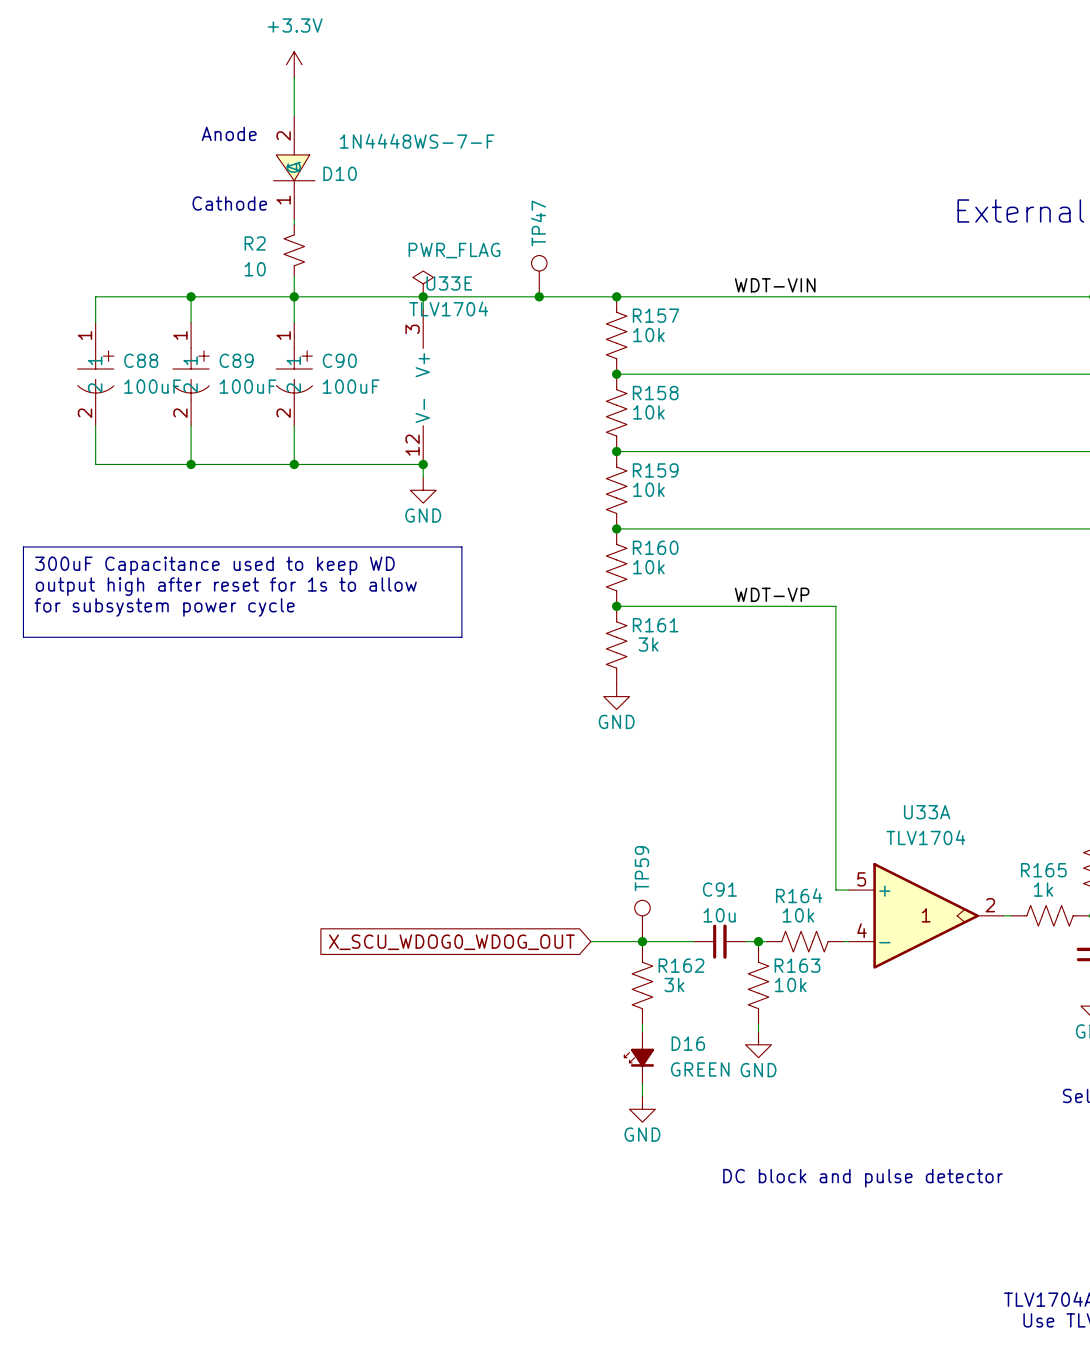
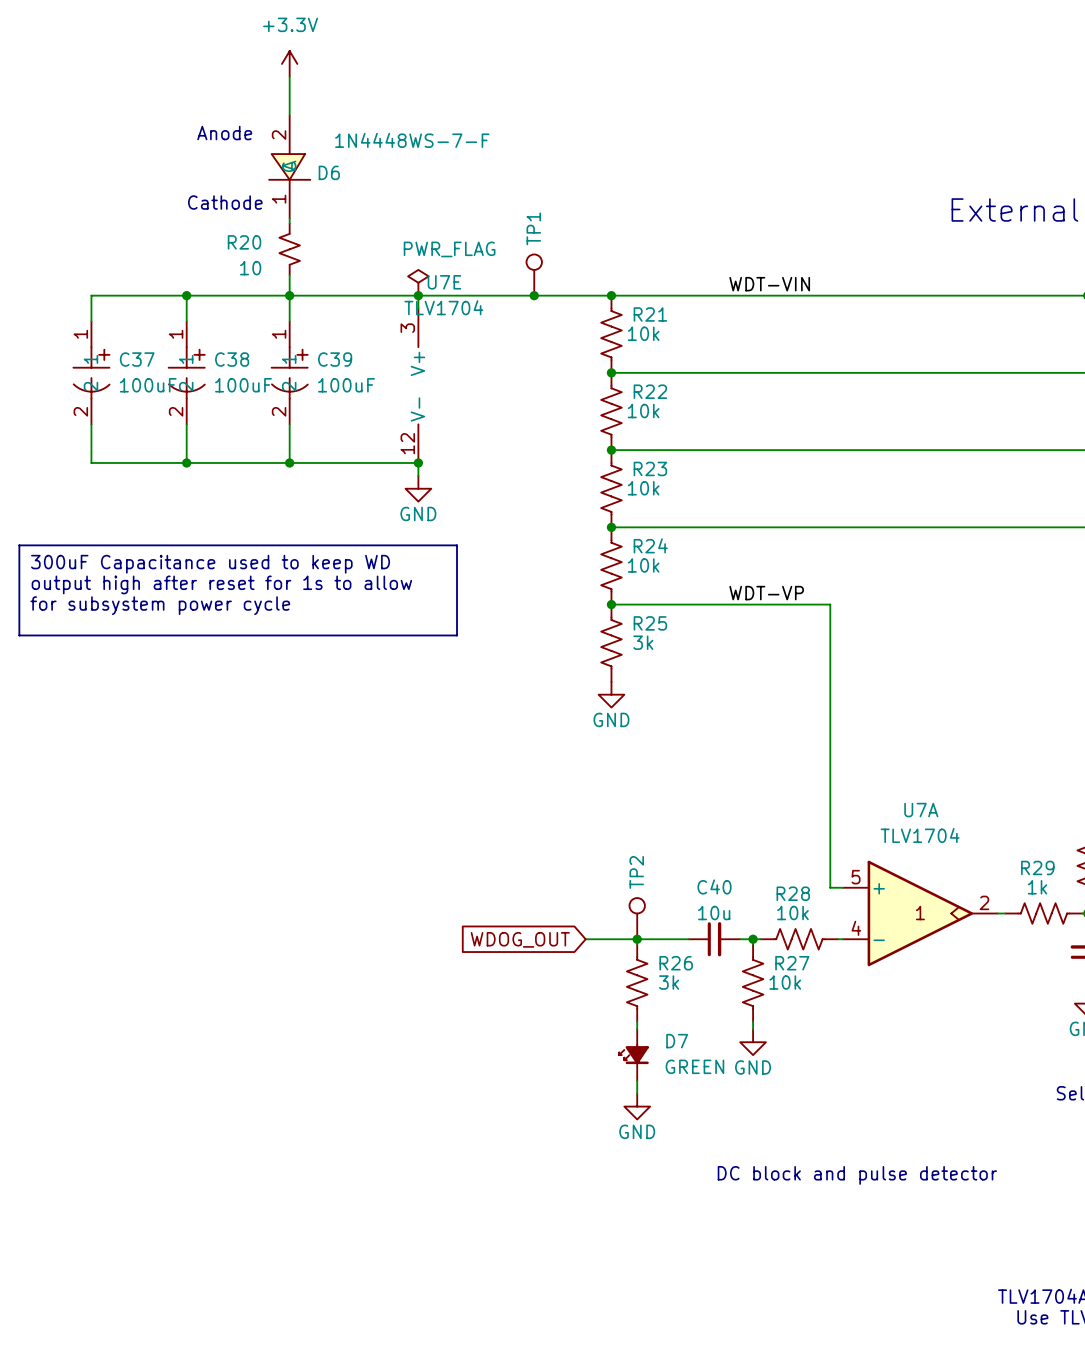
D10 name: D10 (340, 173) -> D6 (329, 172)
TP47 name: TP47 (538, 223) -> TP1 (533, 228)
R2 name: R2 (255, 243) -> R20 (244, 242)
U33E name: U33E (449, 283) -> U7E (444, 282)
R157 name: R157 (655, 315) -> R21 (650, 314)
C88 name: C88 (141, 360) -> C37 (137, 359)
C89 name: C89 (236, 360) -> C38 (232, 359)
C90 name: C90 (339, 360) -> C39 (335, 359)
R158 name: R158 (655, 393) -> R22 (650, 391)
R159 name: R159 (655, 470) -> R23 (650, 468)
R160 name: R160 (655, 547) -> R24 (650, 545)
R161 name: R161 (655, 625) -> R25 (650, 623)
U33A name: U33A (927, 812) -> U7A (921, 810)
TP59 name: TP59 (641, 868) -> TP2 (636, 872)
R165 name: R165 (1043, 870) -> R29 (1037, 867)
C91 name: C91 (719, 889) -> C40 (714, 886)
R164 name: R164 (799, 895) -> R28 (793, 893)
global label: X_SCU_WDOG0_WDOG_OUT (451, 942) -> WDOG_OUT (520, 939)
R162 name: R162 (681, 965) -> R26 (676, 963)
R163 name: R163 (797, 965) -> R27 (792, 963)
D16 name: D16 (688, 1043) -> D7 (677, 1041)

